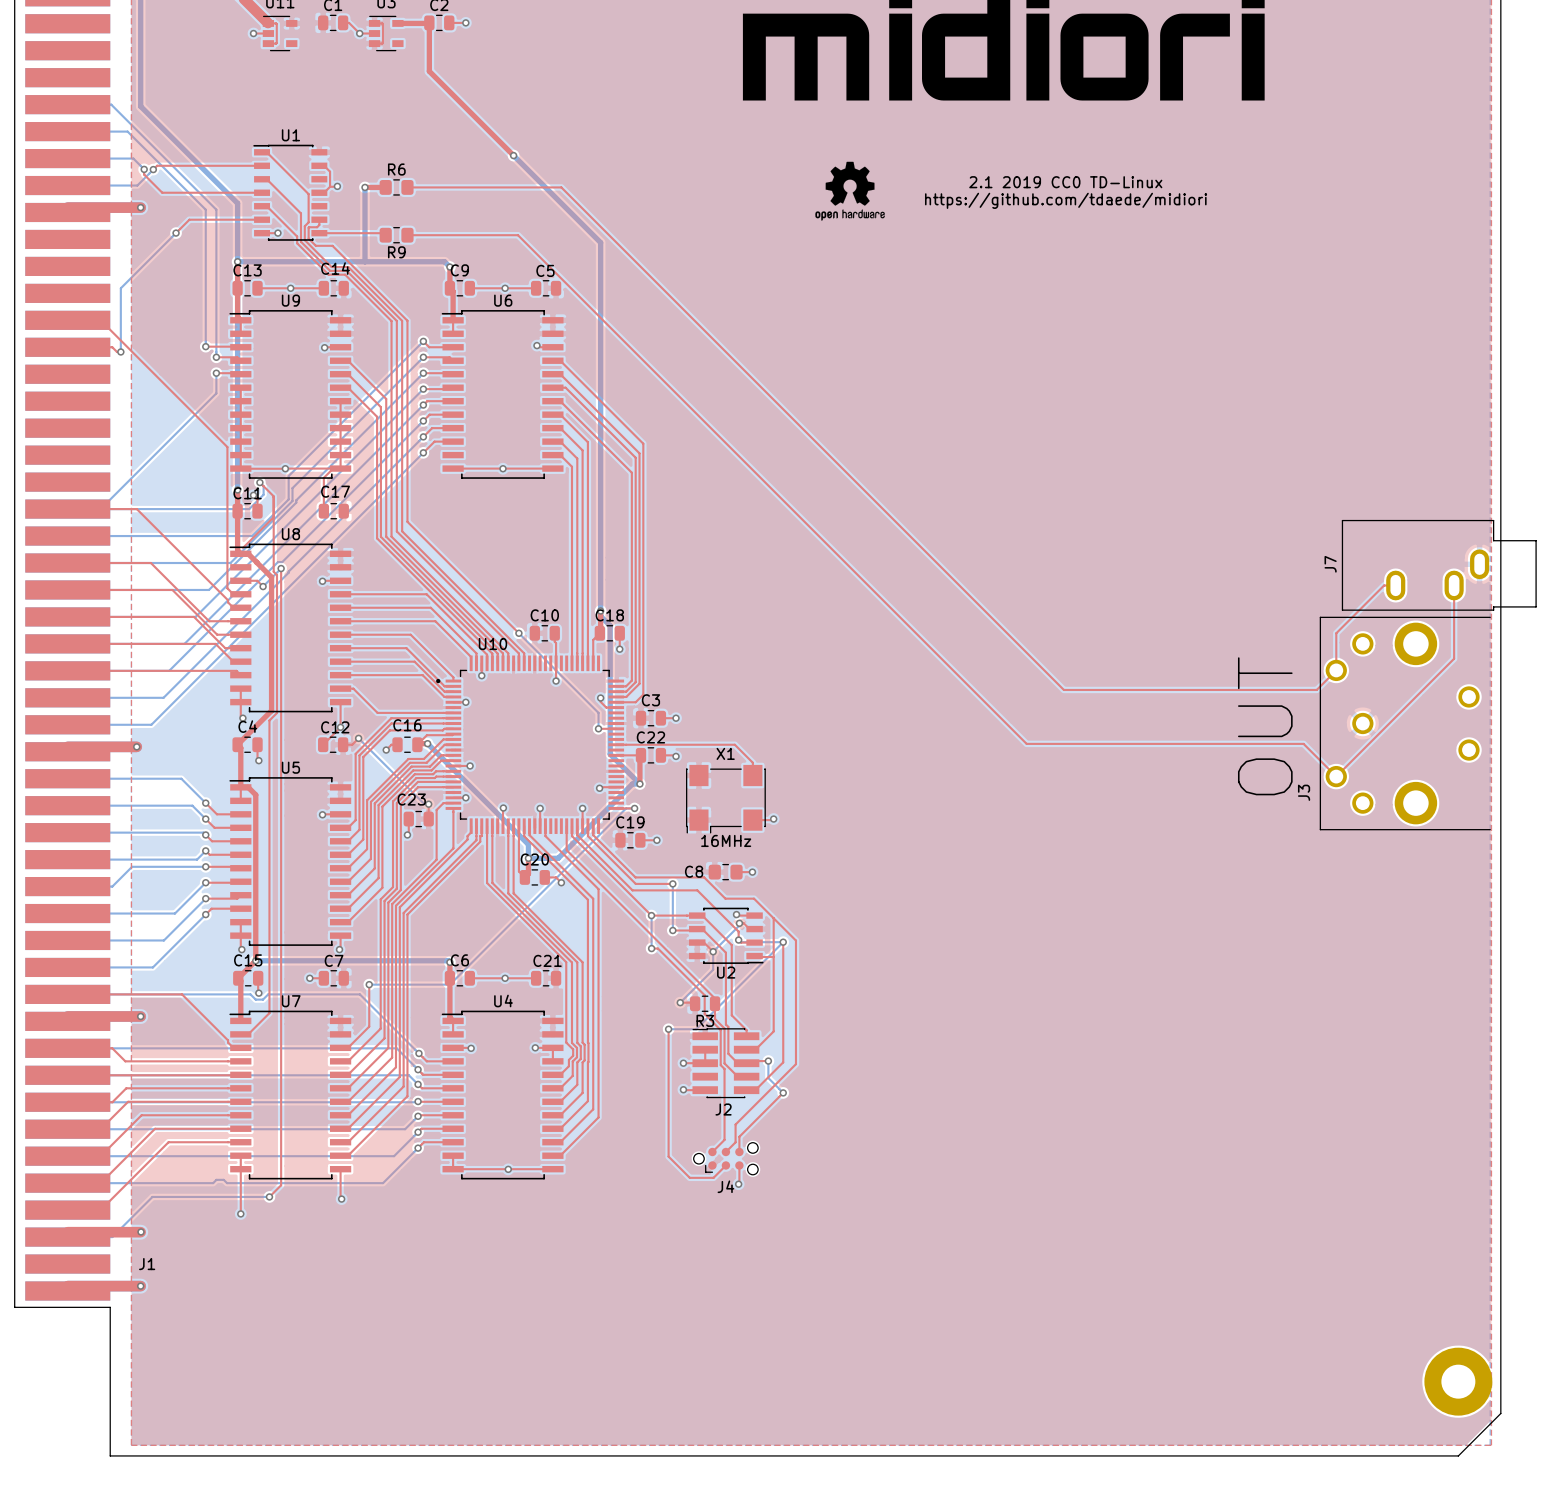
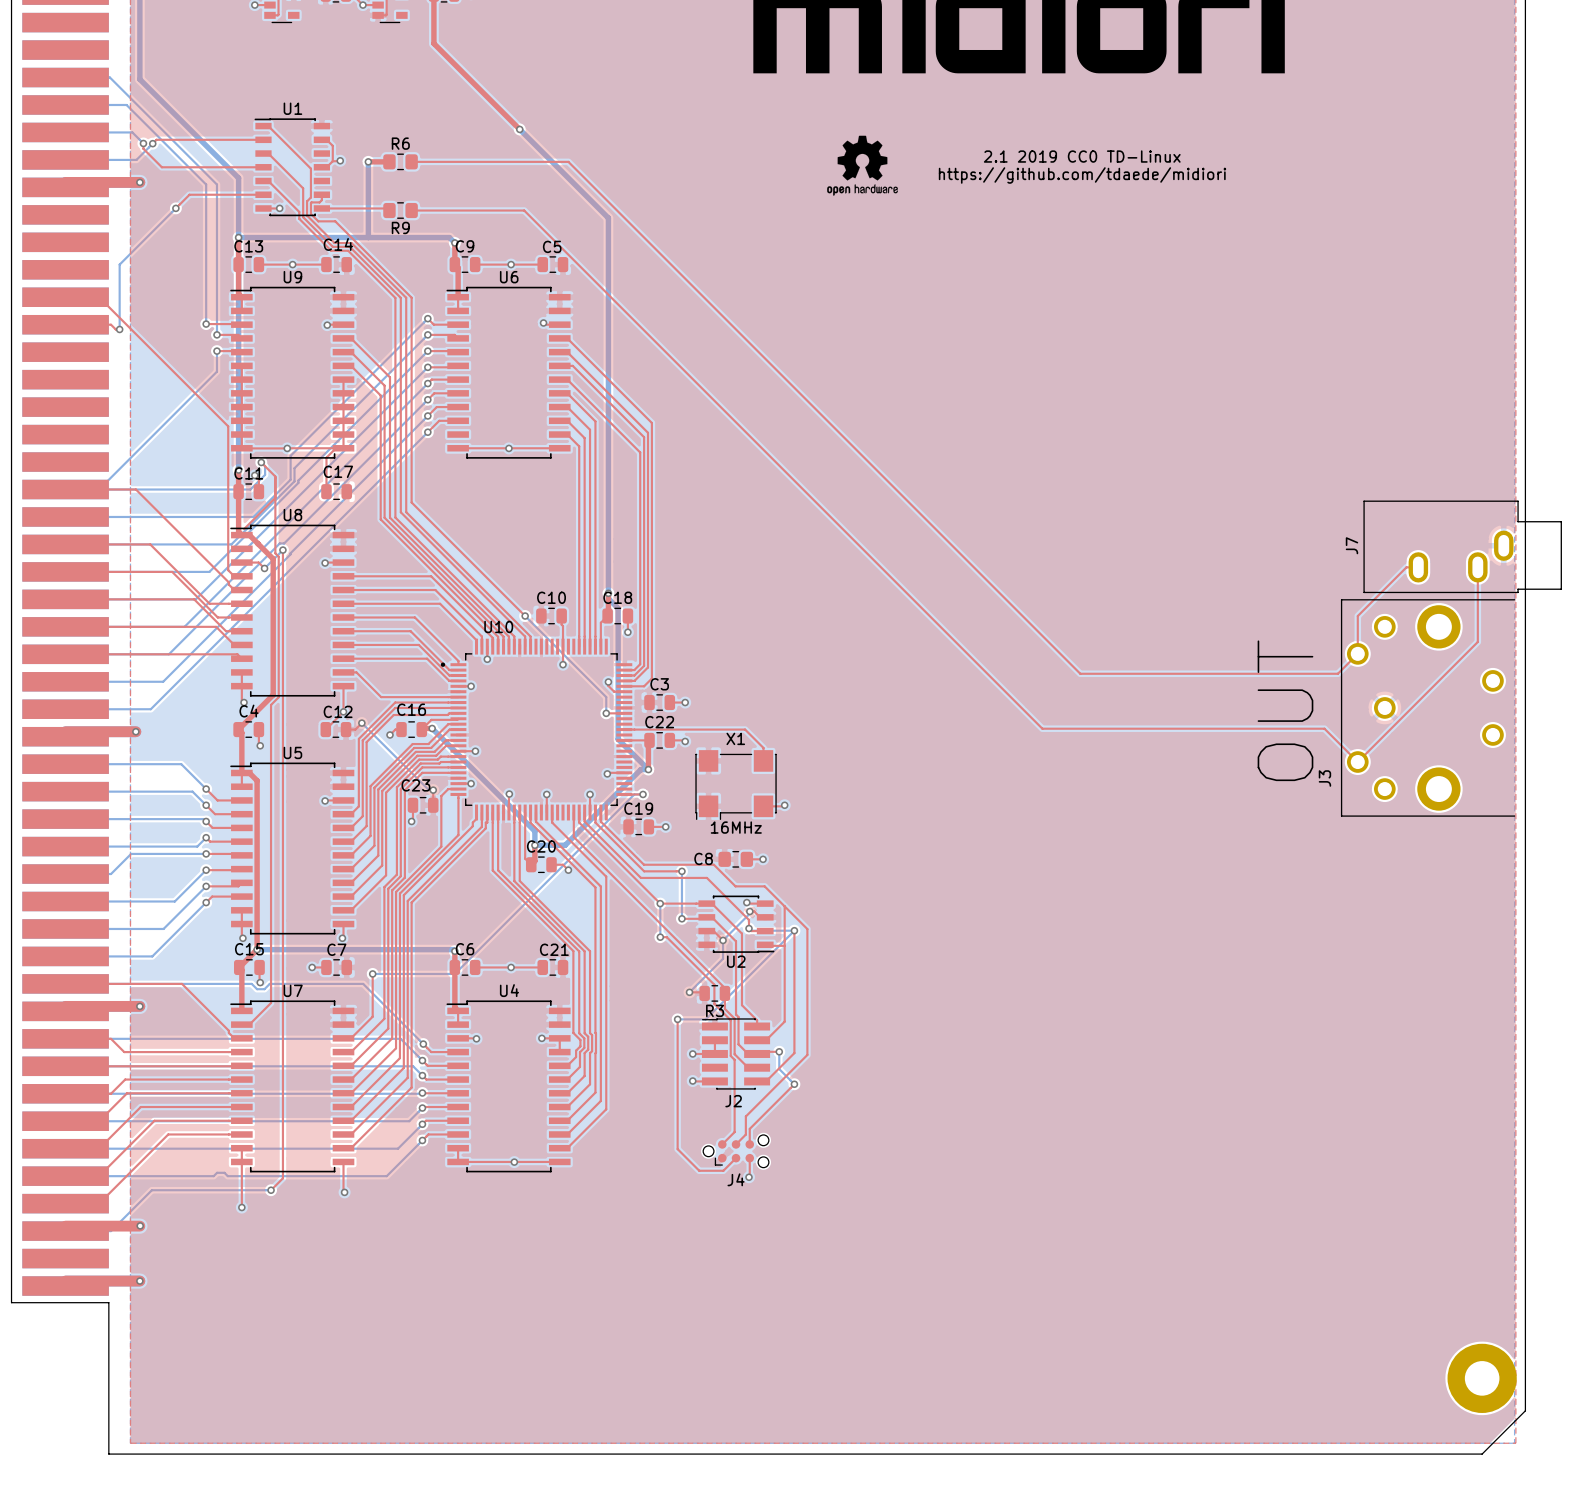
J1 name: J1 (147, 1264) -> none

